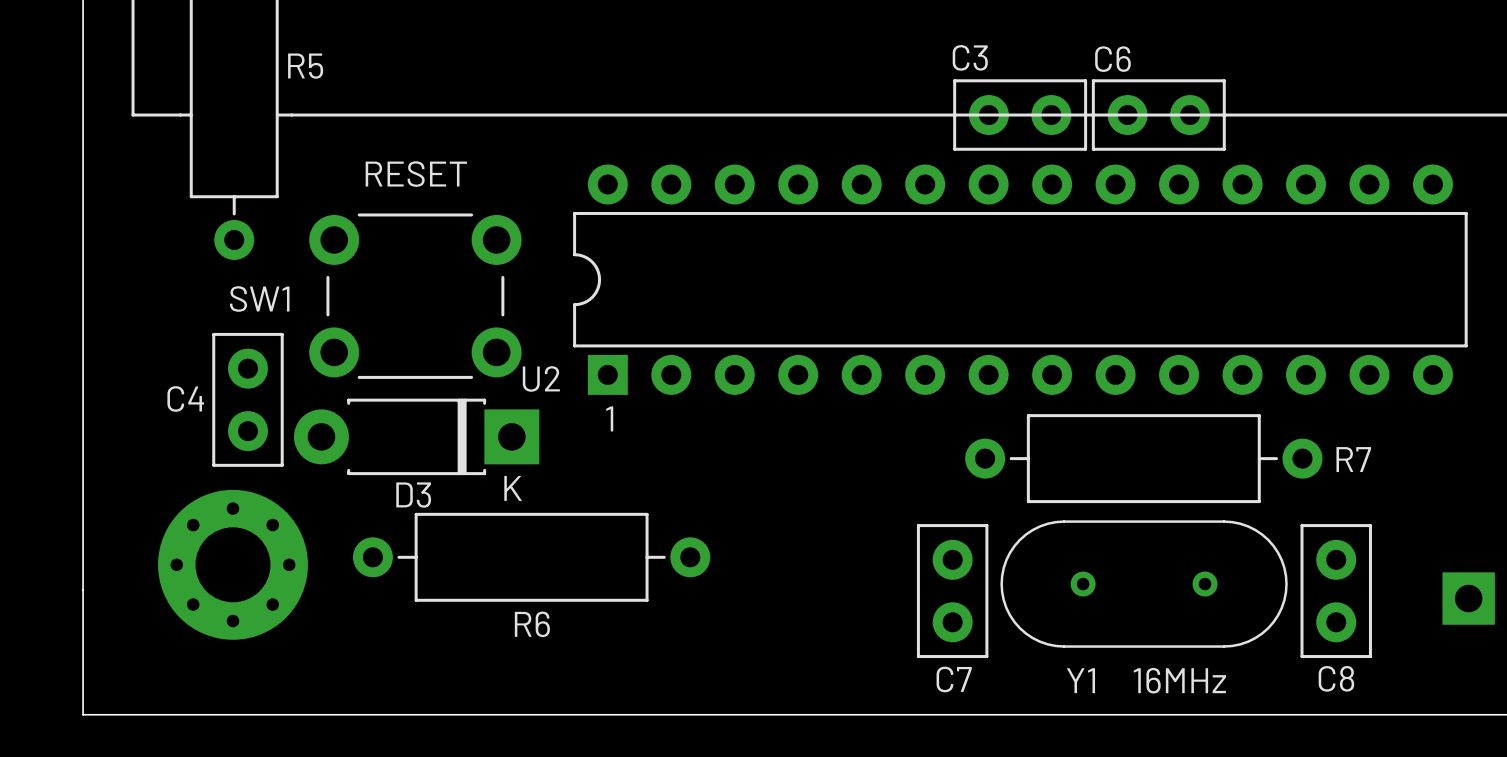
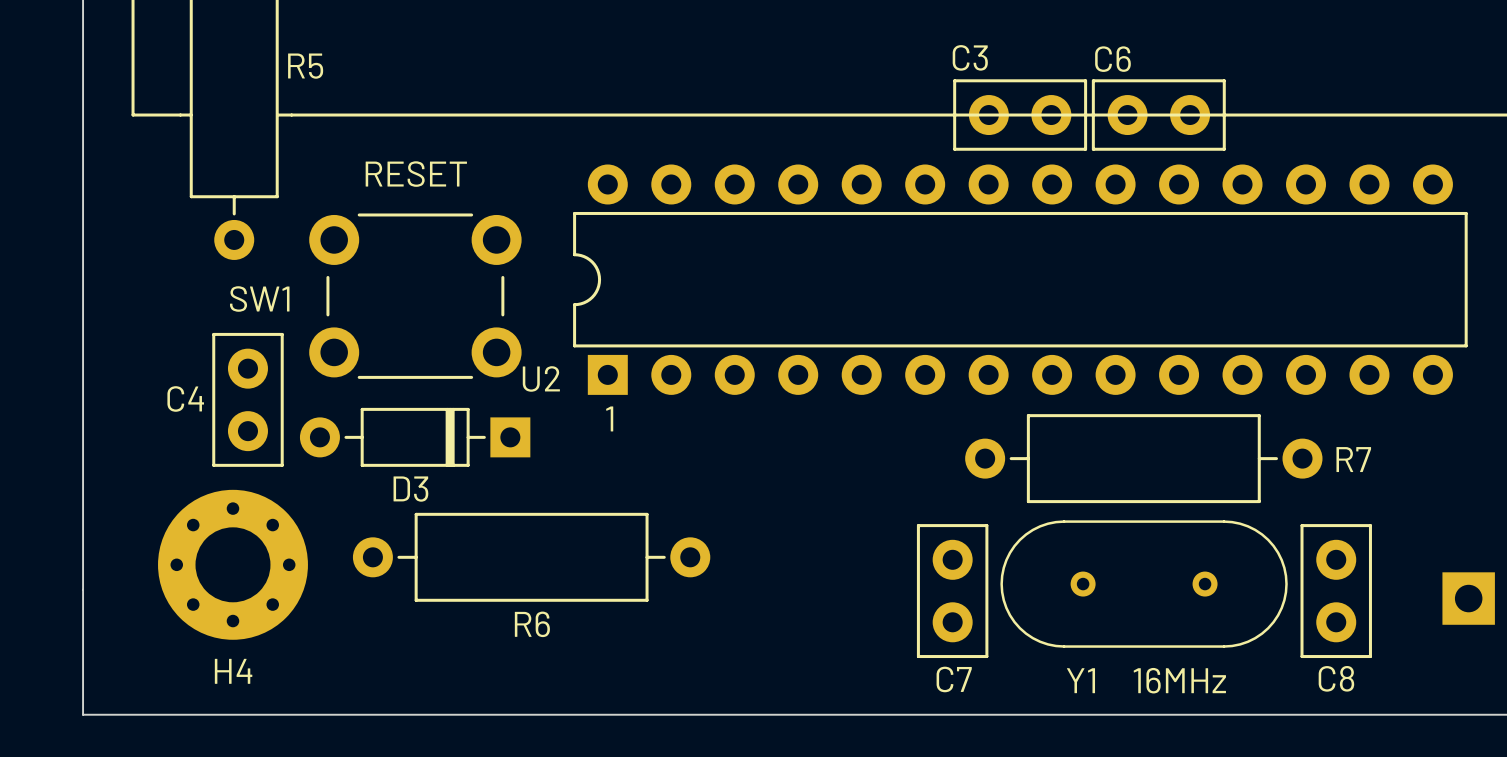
D3 footprint: [293, 398, 540, 476] -> [299, 407, 531, 467]
H4 name: none -> H4 (233, 671)

